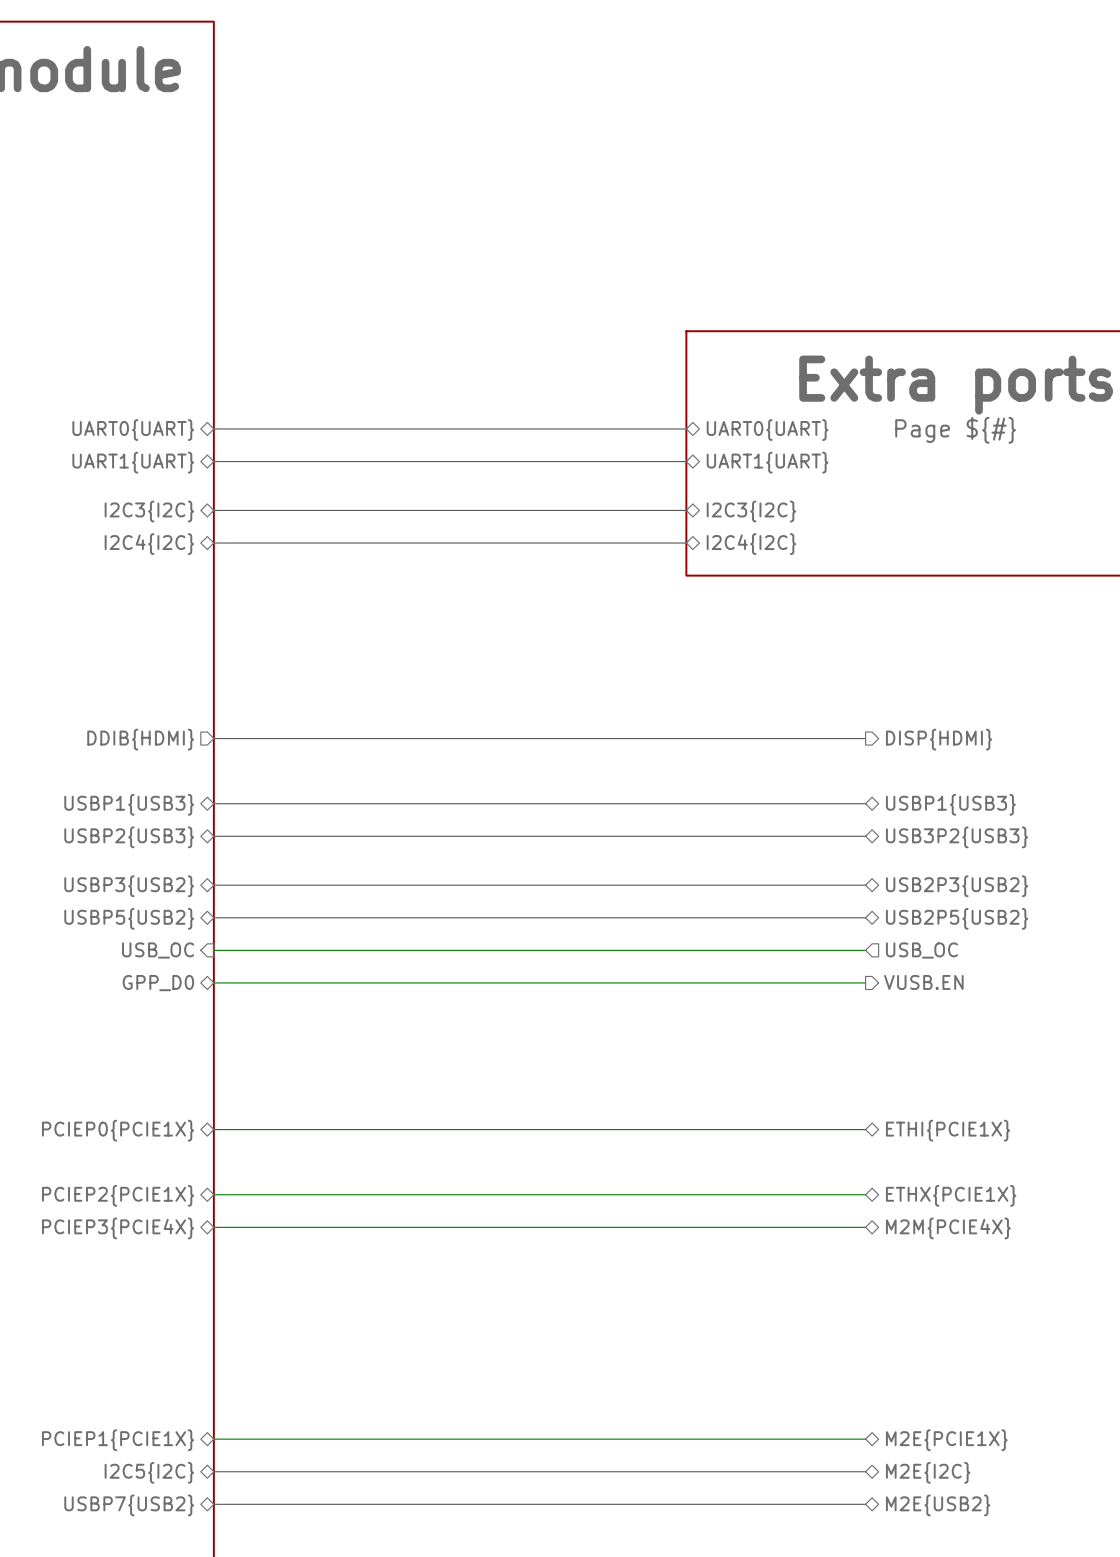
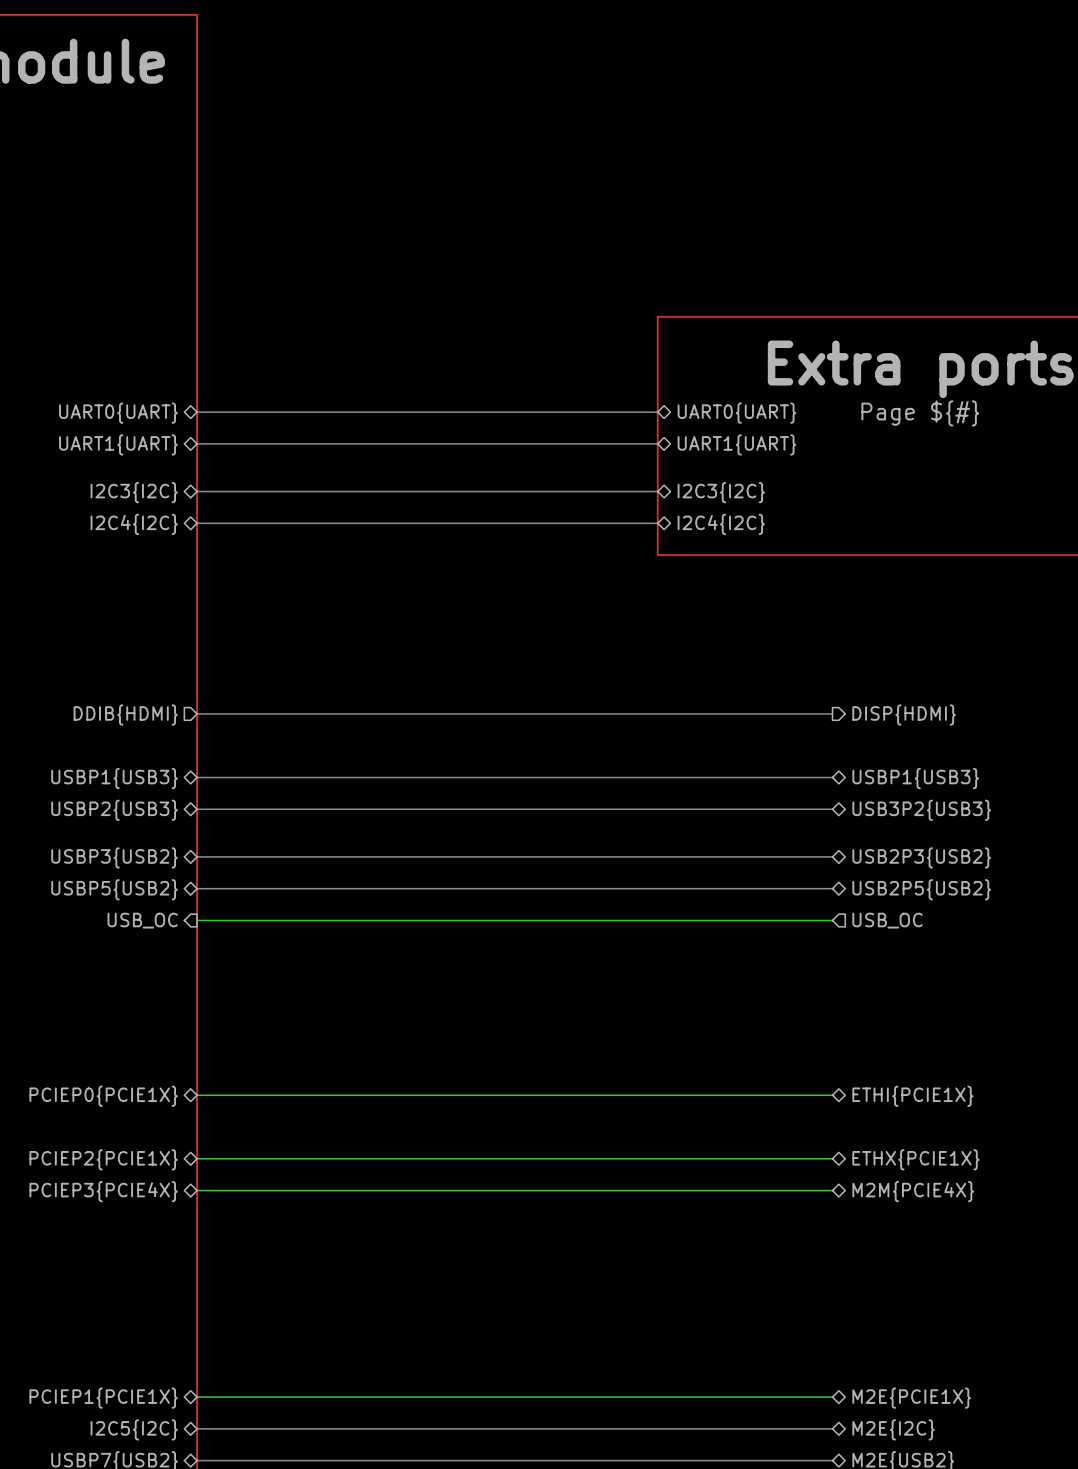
wire: (213, 982) (865, 982) -> none
hierarchical label: VUSB.EN (923, 982) -> none
sheet pin: GPP_D0 (158, 983) -> none

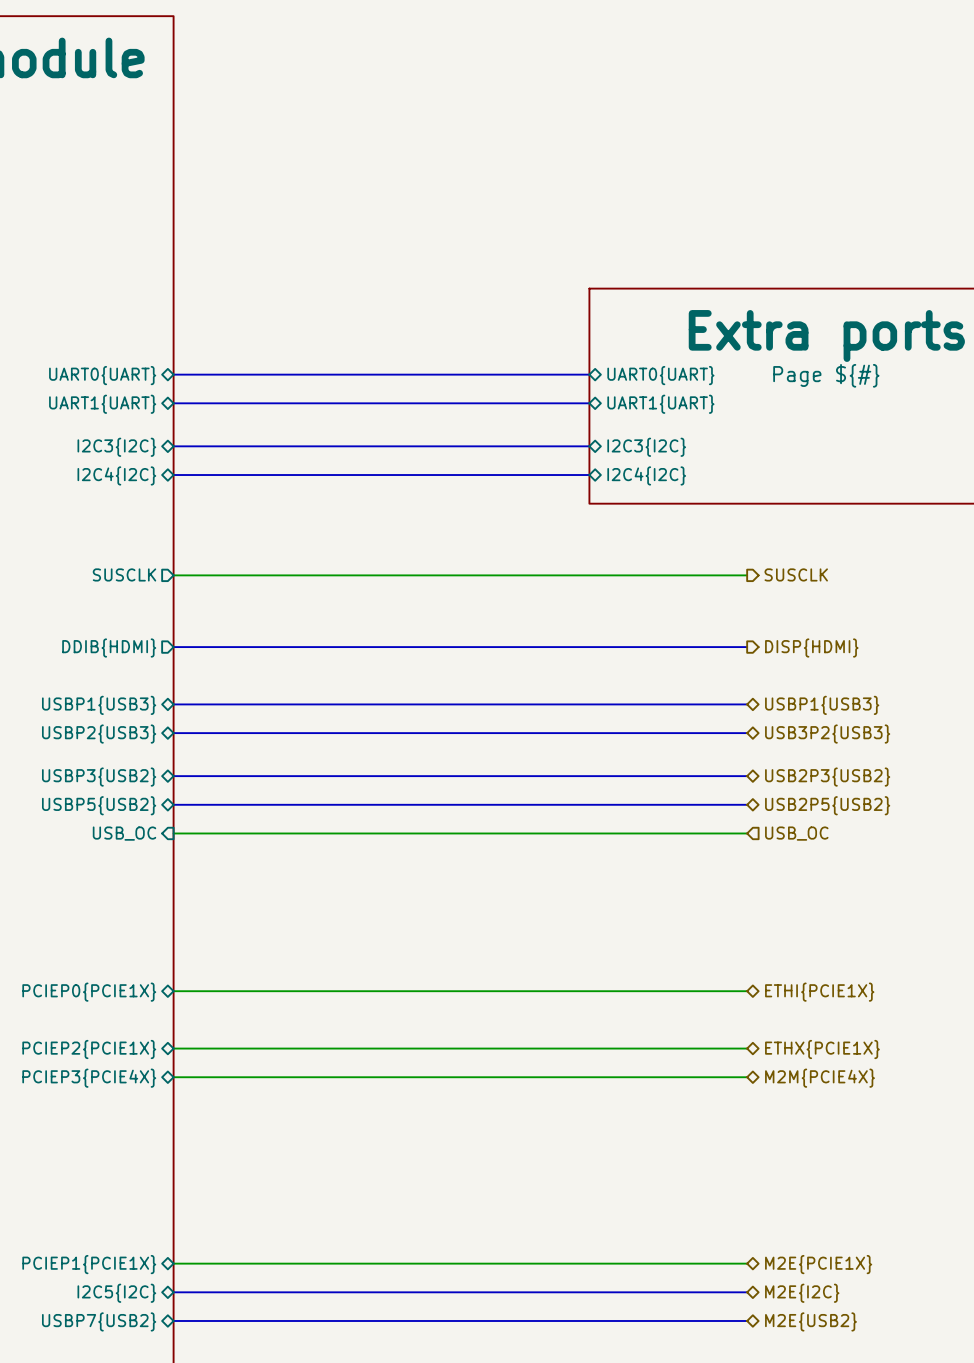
sheet pin: none -> SUSCLK (124, 574)
wire: none -> (173, 575) (747, 575)
hierarchical label: none -> SUSCLK (796, 574)

